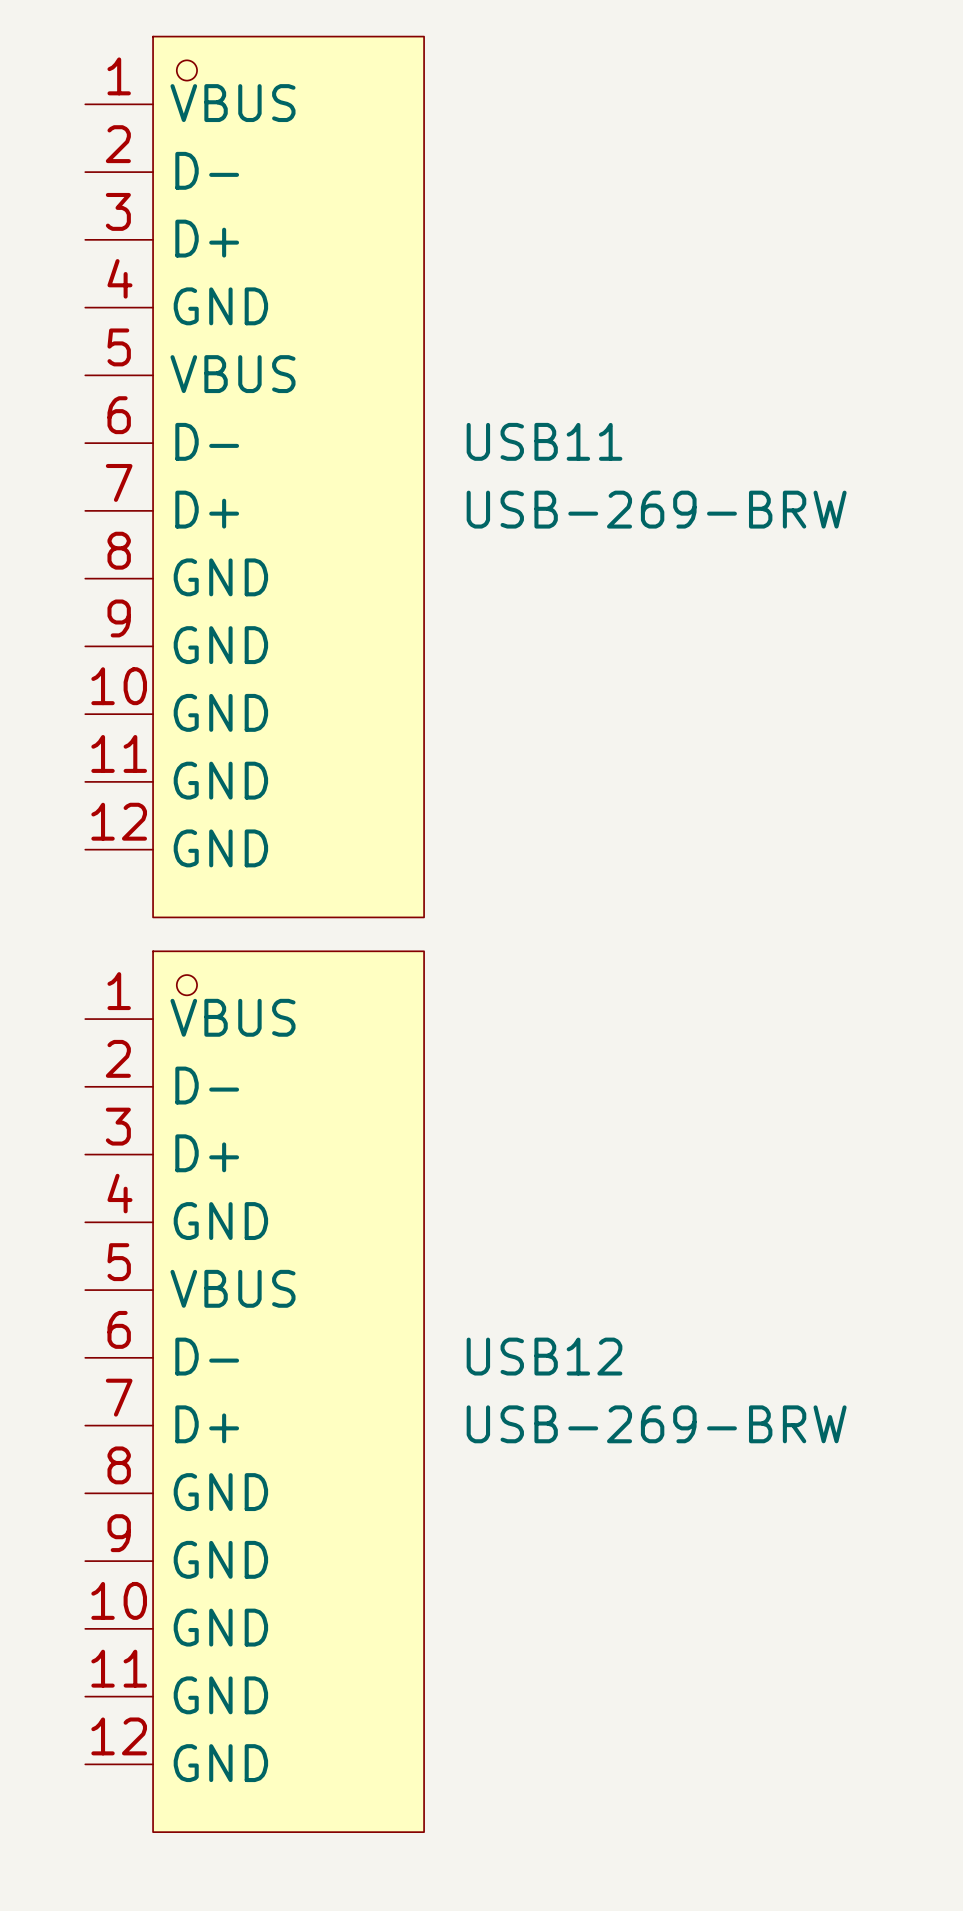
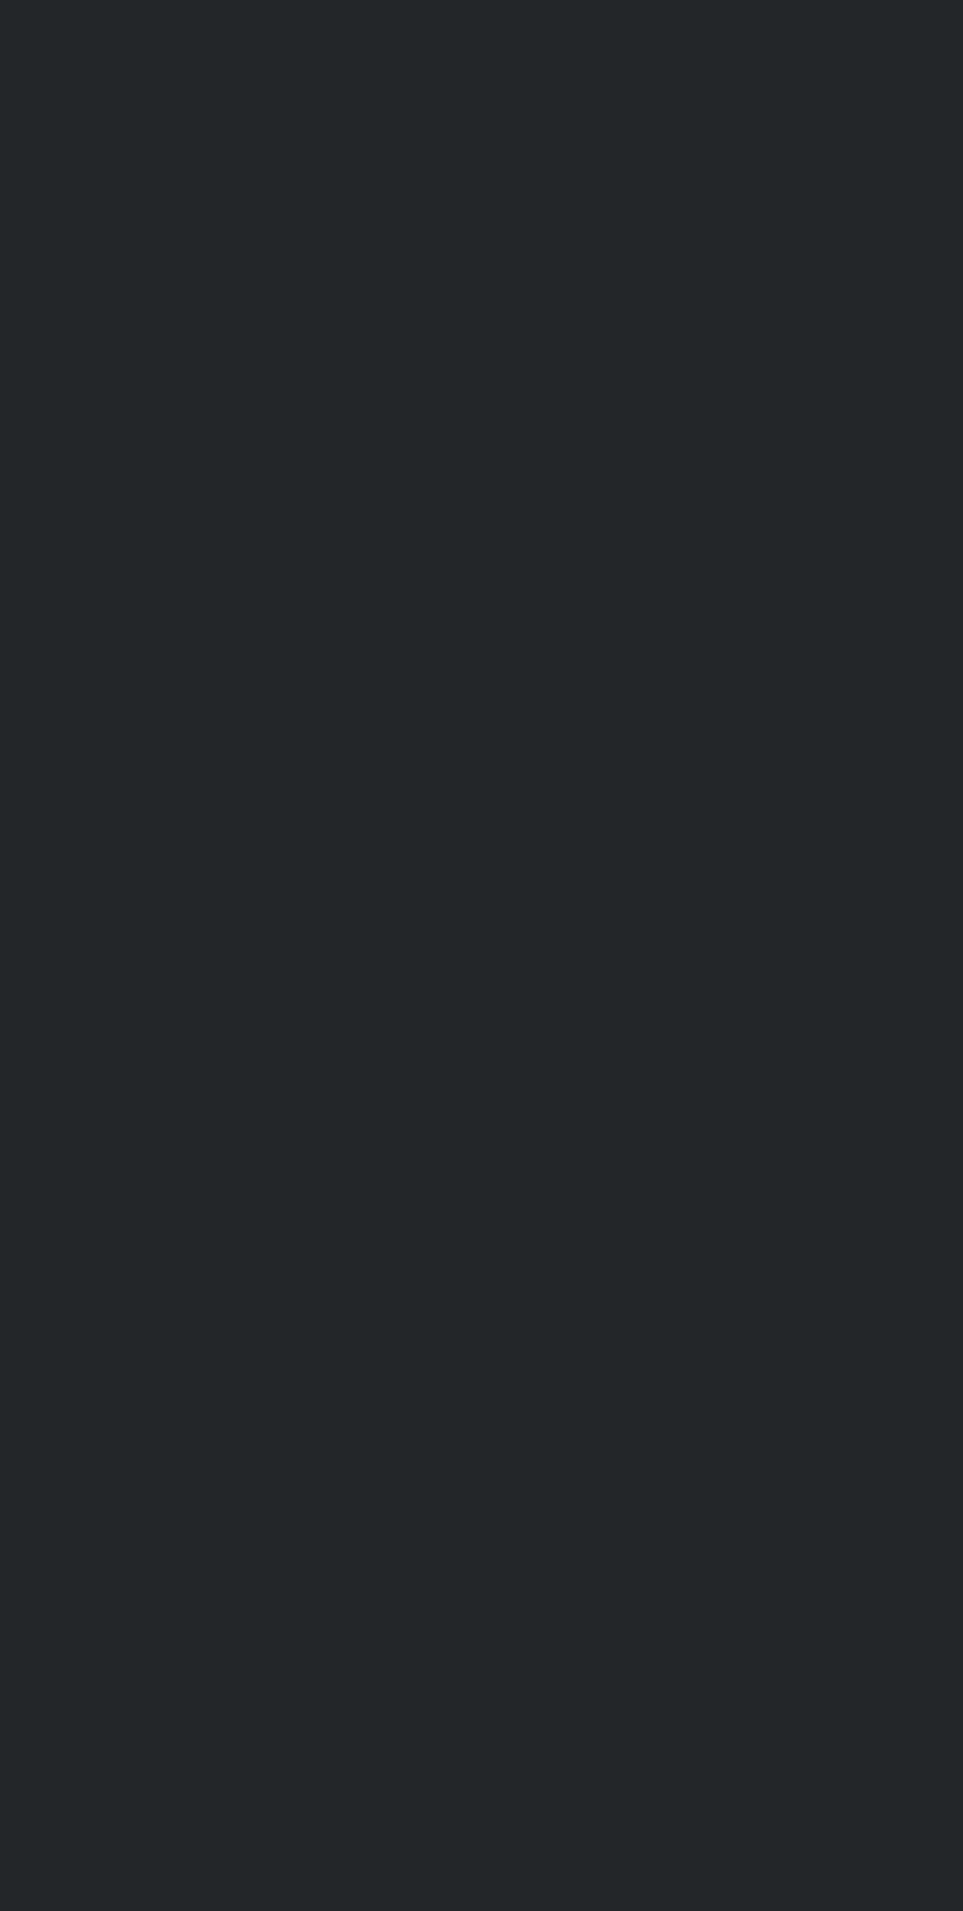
USB11: USB-269-BRW (254, 477) -> none
USB12: USB-269-BRW (254, 1391) -> none

